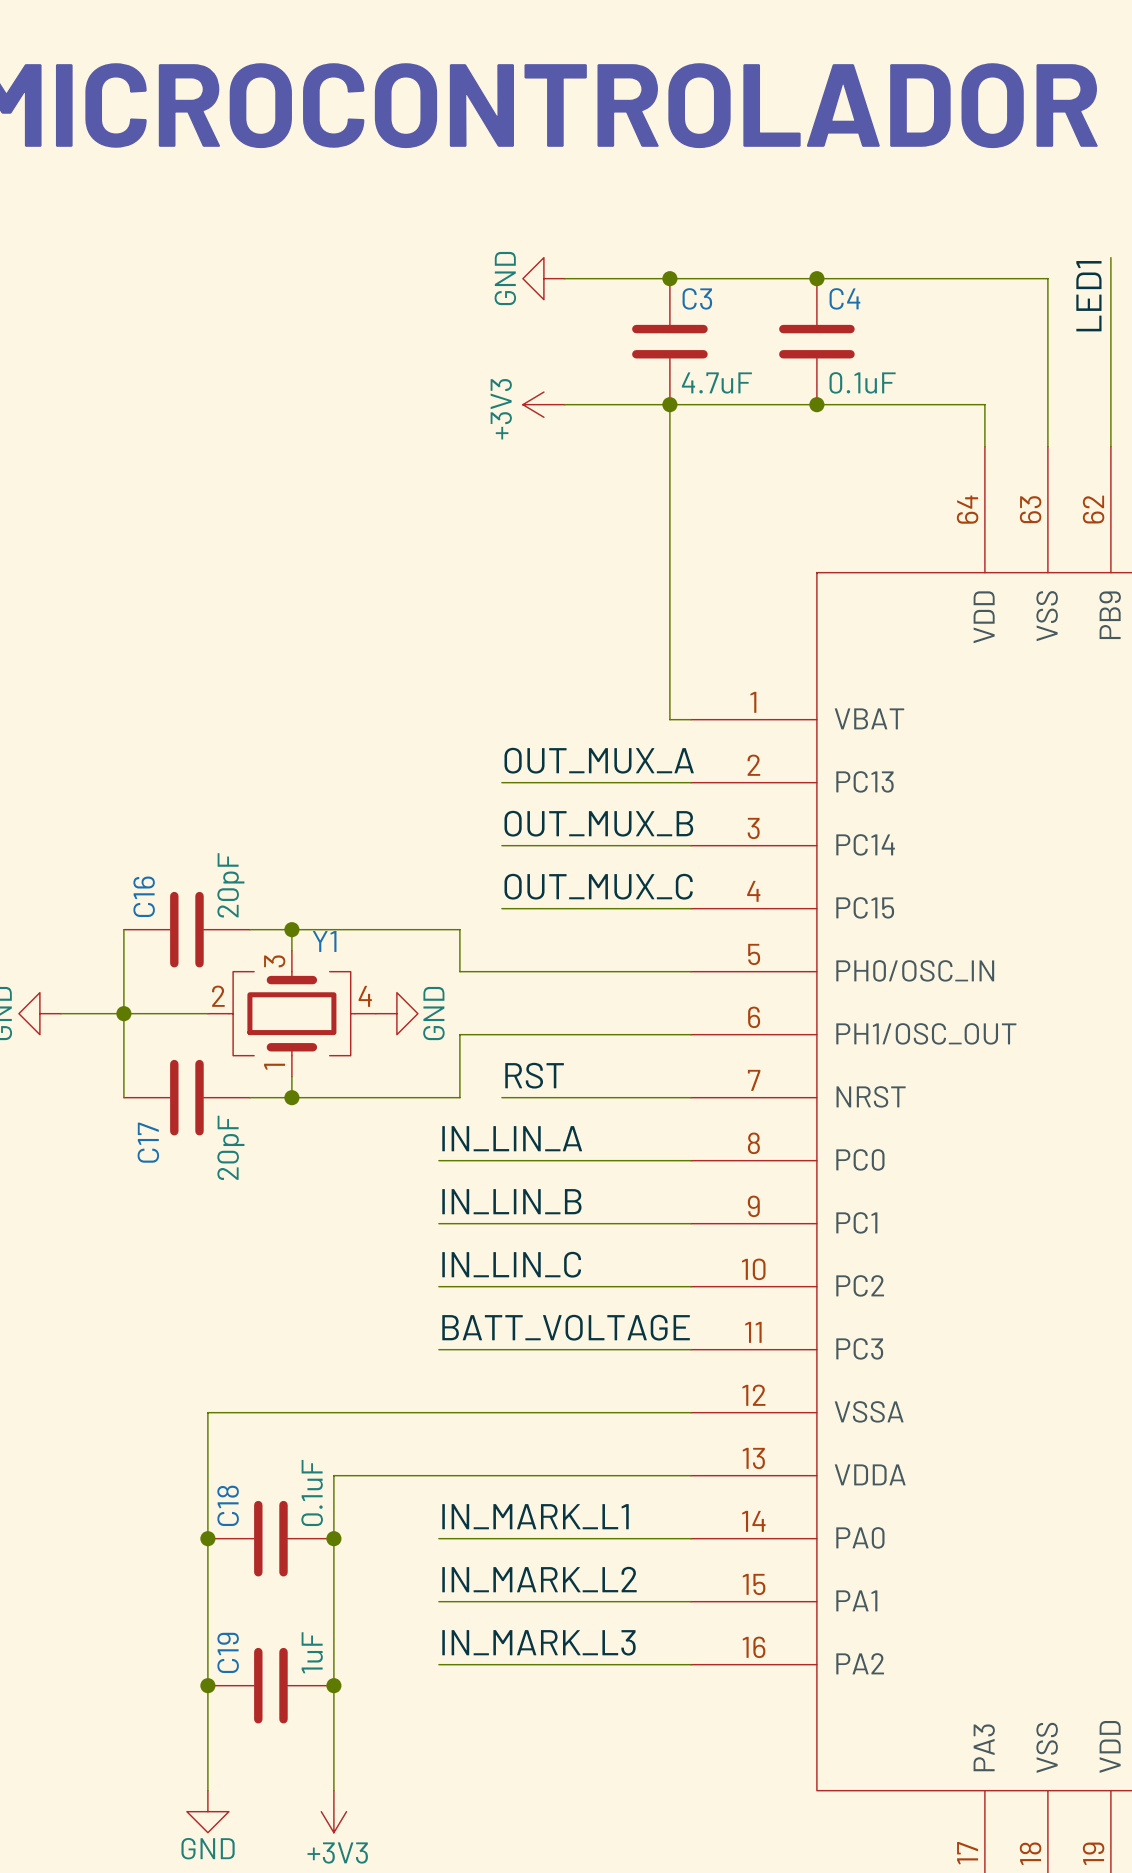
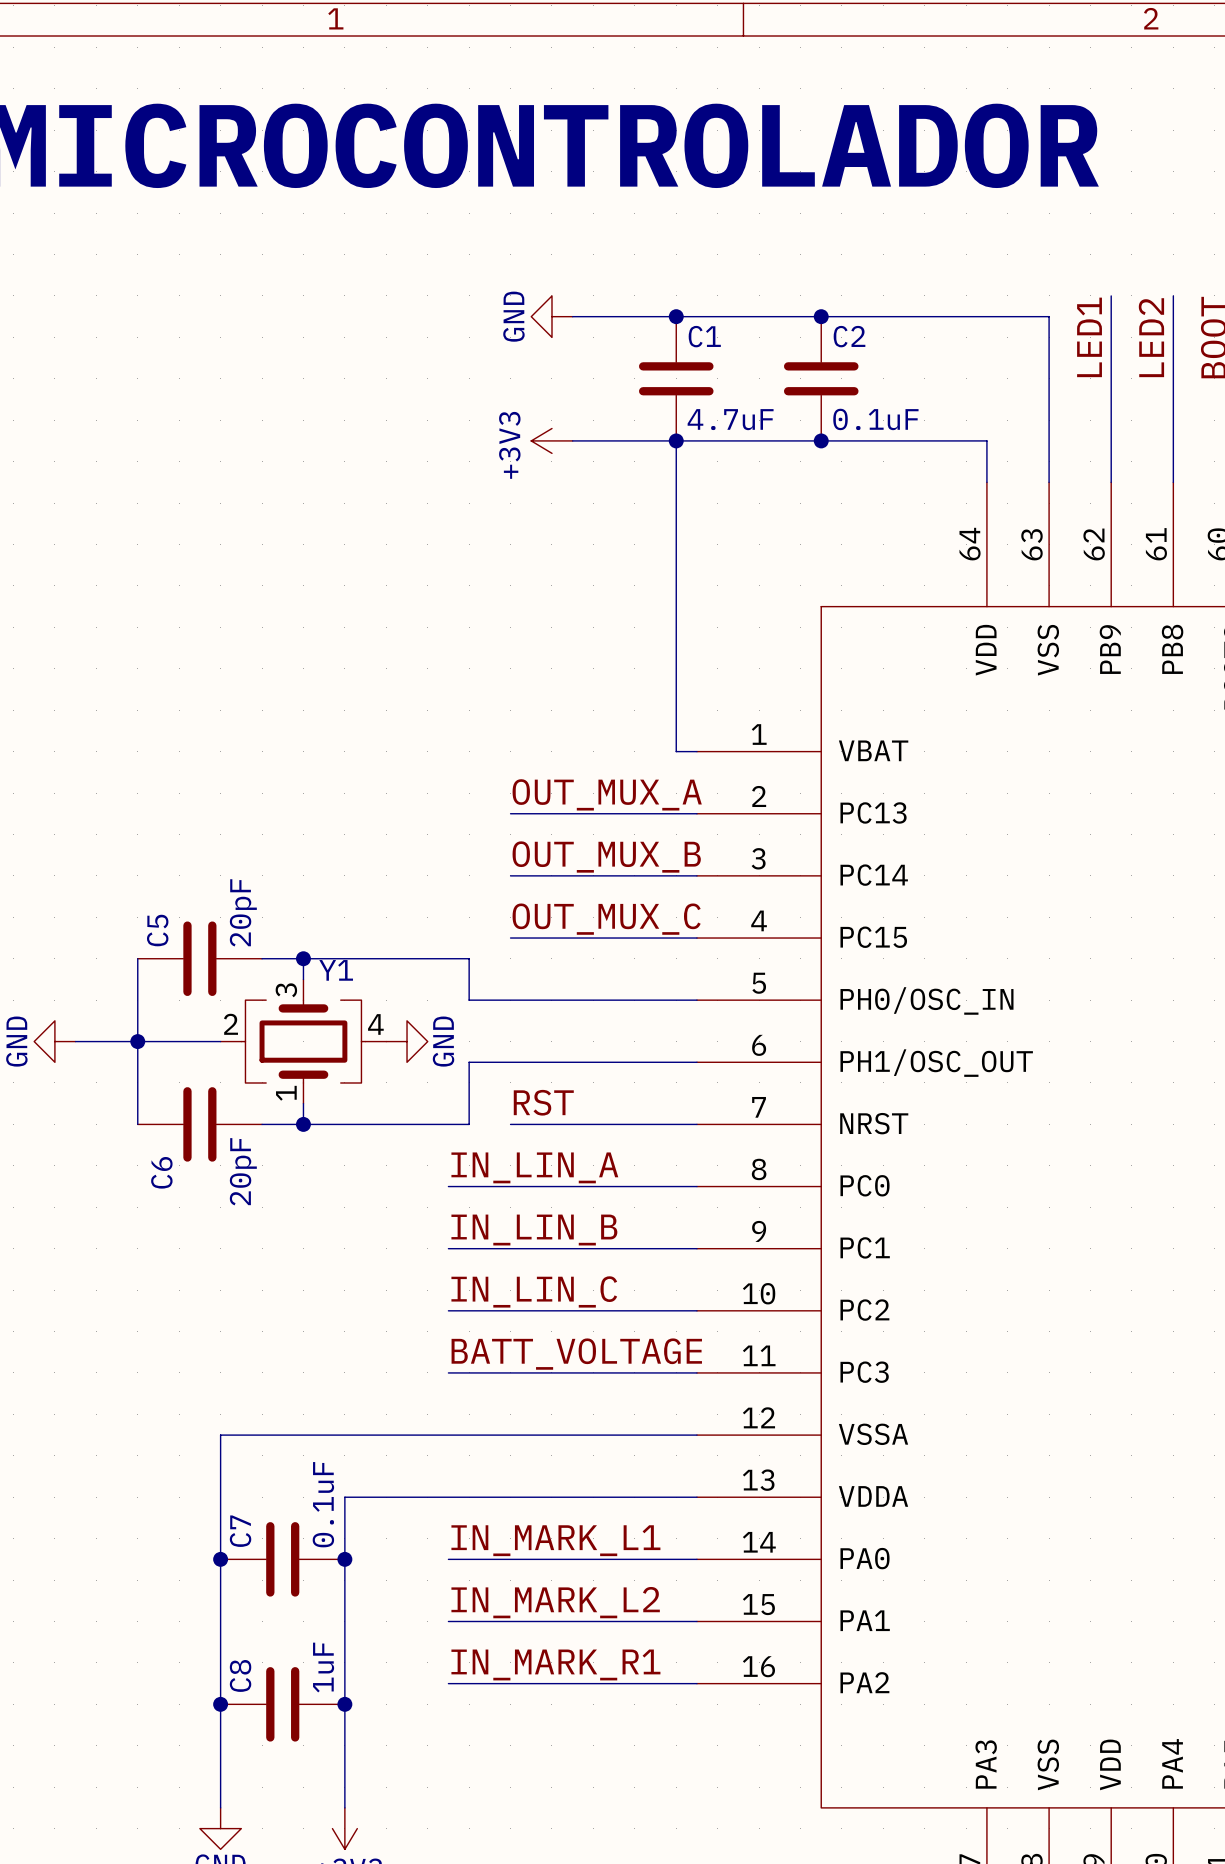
C3 name: C3 (697, 298) -> C1 (704, 336)
C4 name: C4 (844, 298) -> C2 (849, 336)
C16 name: C16 (144, 896) -> C5 (157, 930)
C17 name: C17 (148, 1142) -> C6 (161, 1172)
C18 name: C18 (228, 1505) -> C7 (240, 1531)
label: IN_MARK_L3 (538, 1642) -> IN_MARK_R1 (555, 1664)
C19 name: C19 (228, 1652) -> C8 (240, 1675)

